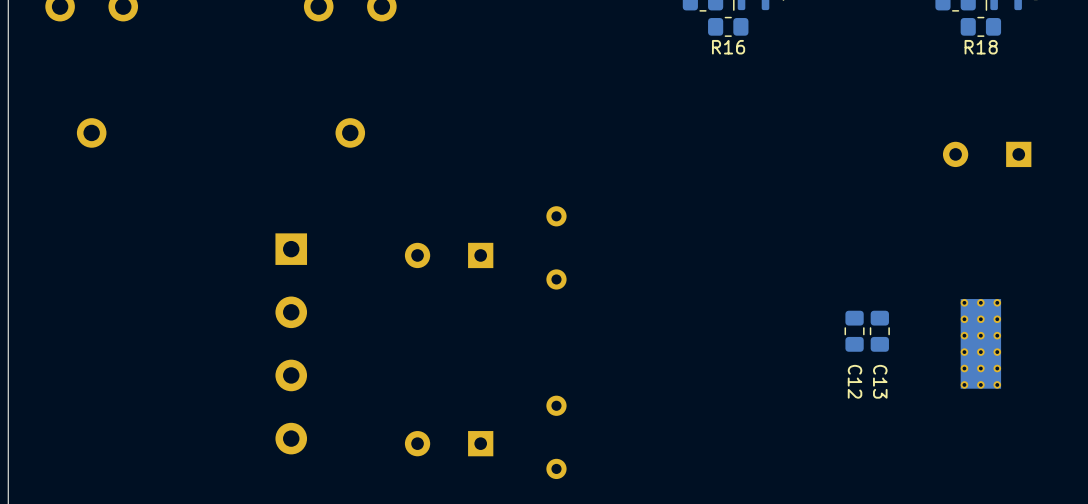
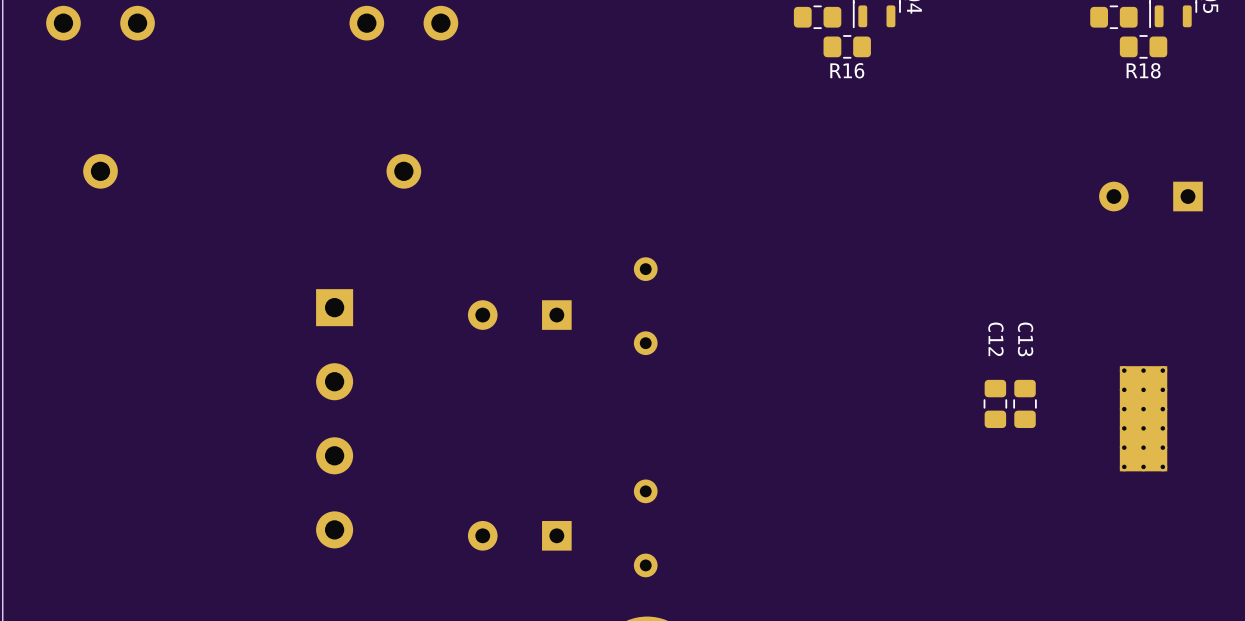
C12 name position: C12 (855, 381) -> C12 (995, 339)
C13 name position: C13 (880, 381) -> C13 (1025, 339)

